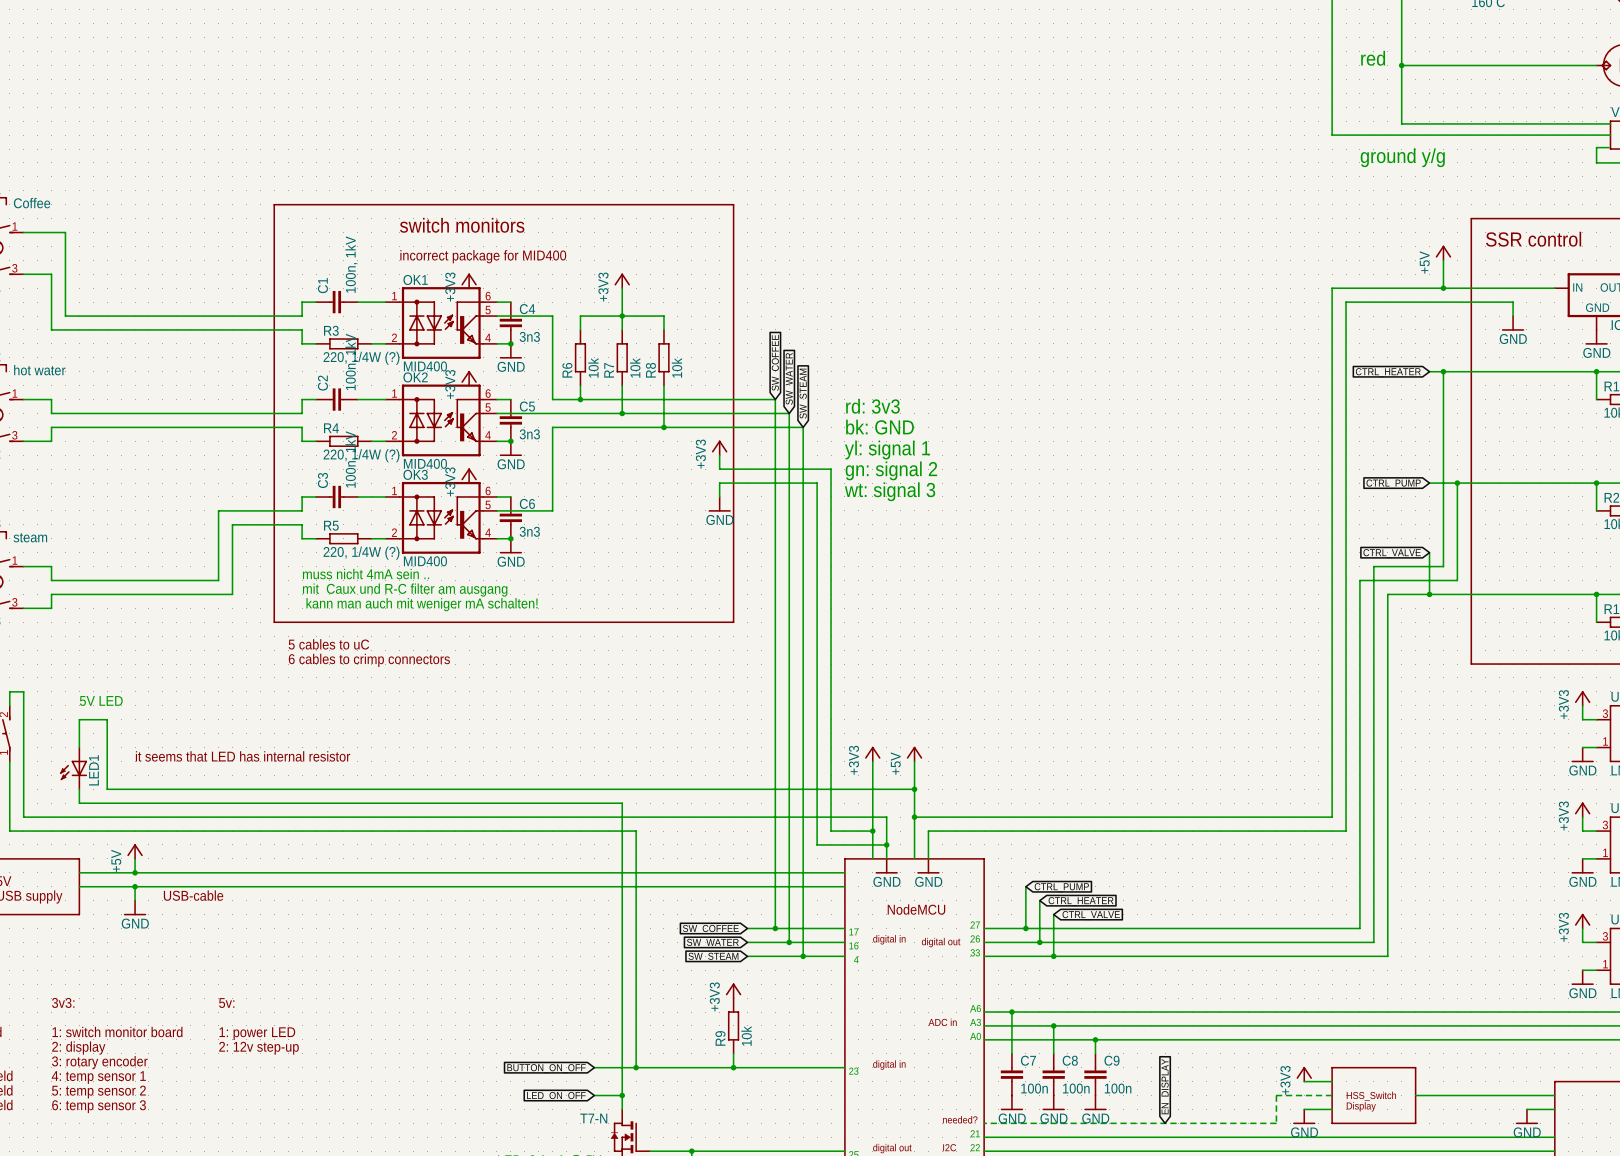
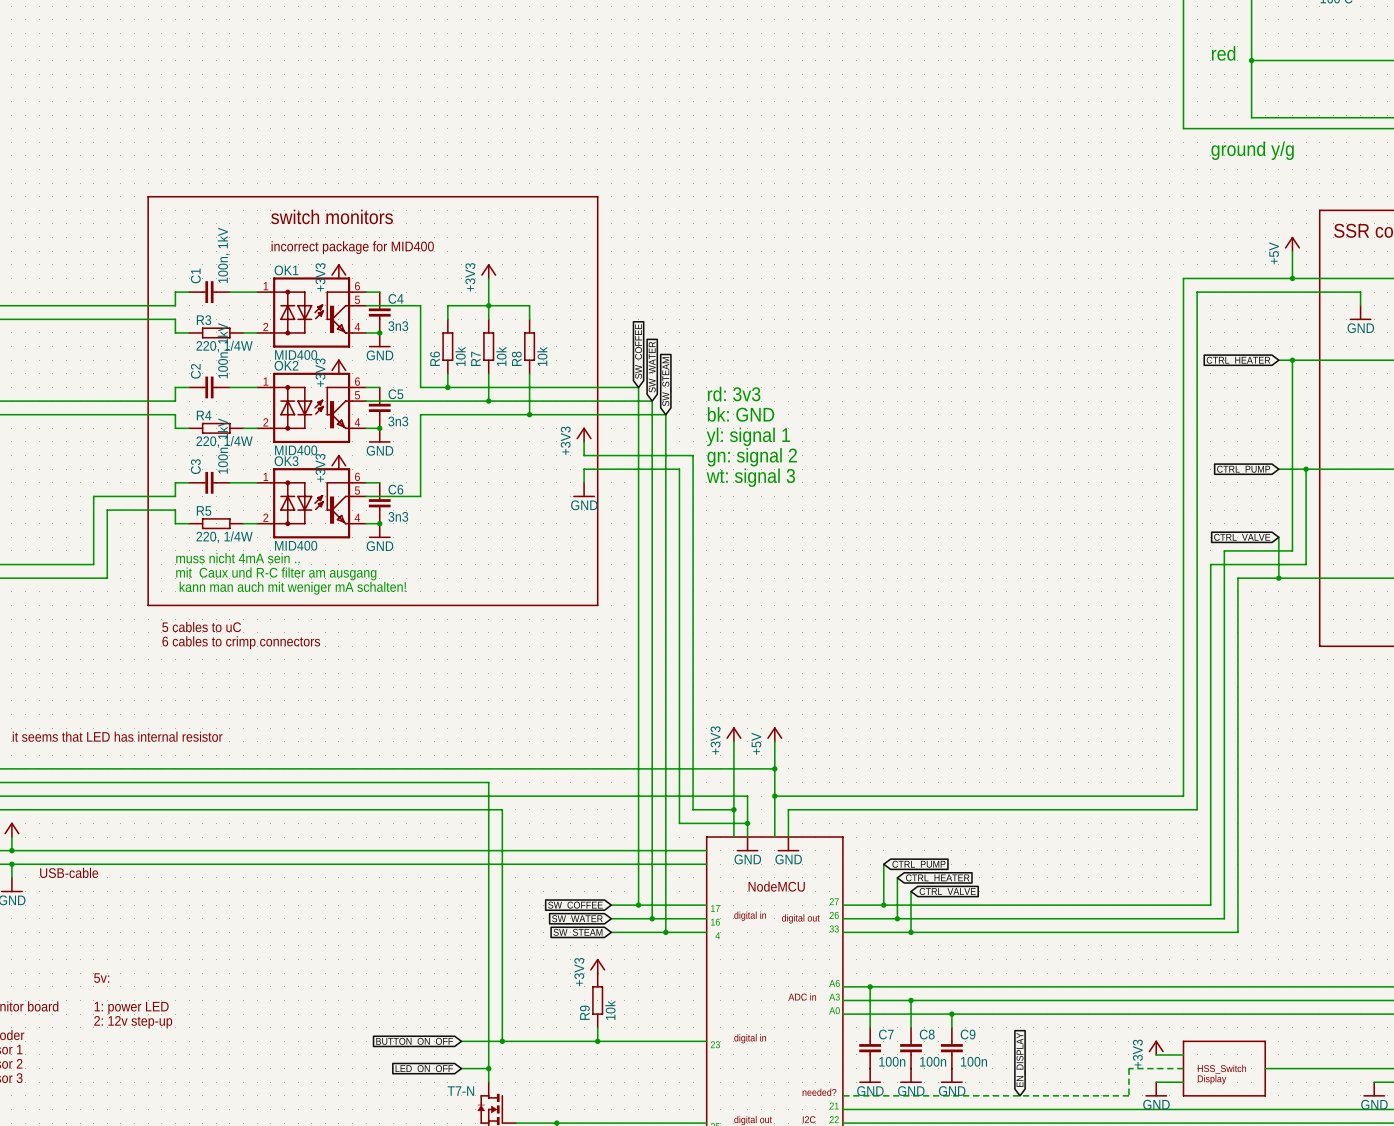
R3 value: 220, 1/4W (?) (361, 358) -> 220, 1/4W (224, 346)
R4 value: 220, 1/4W (?) (361, 455) -> 220, 1/4W (224, 441)
R5 value: 220, 1/4W (?) (361, 553) -> 220, 1/4W (224, 537)

